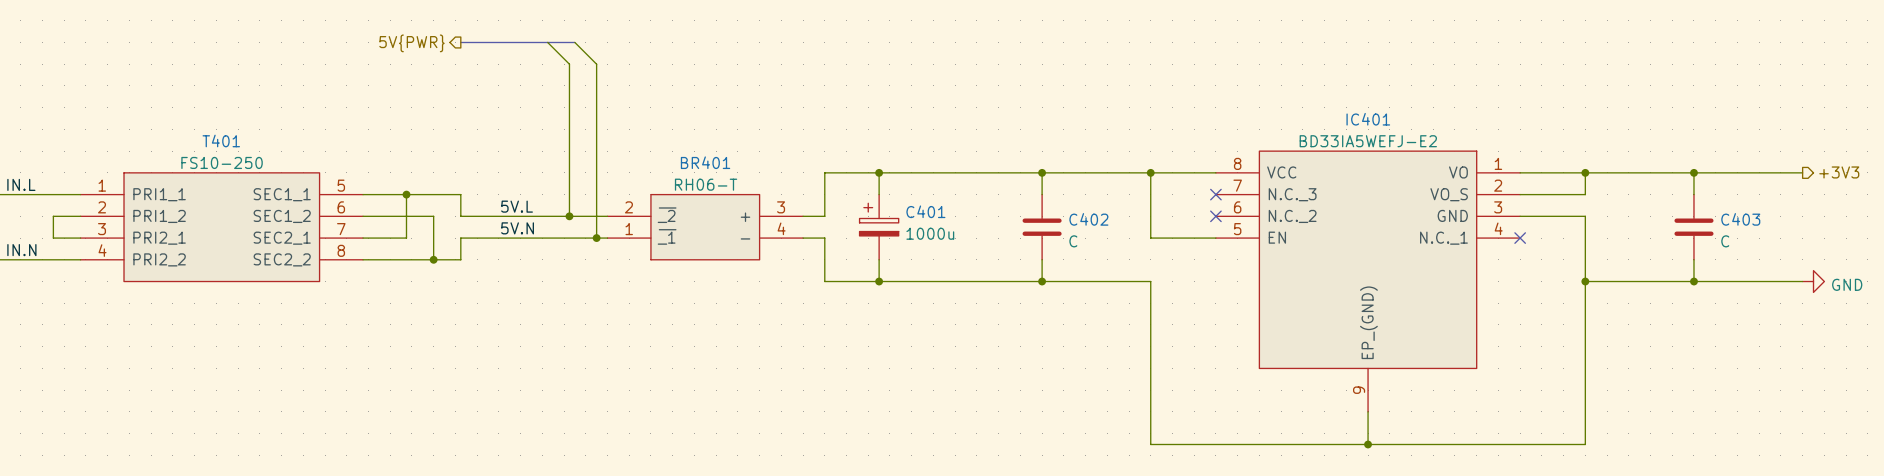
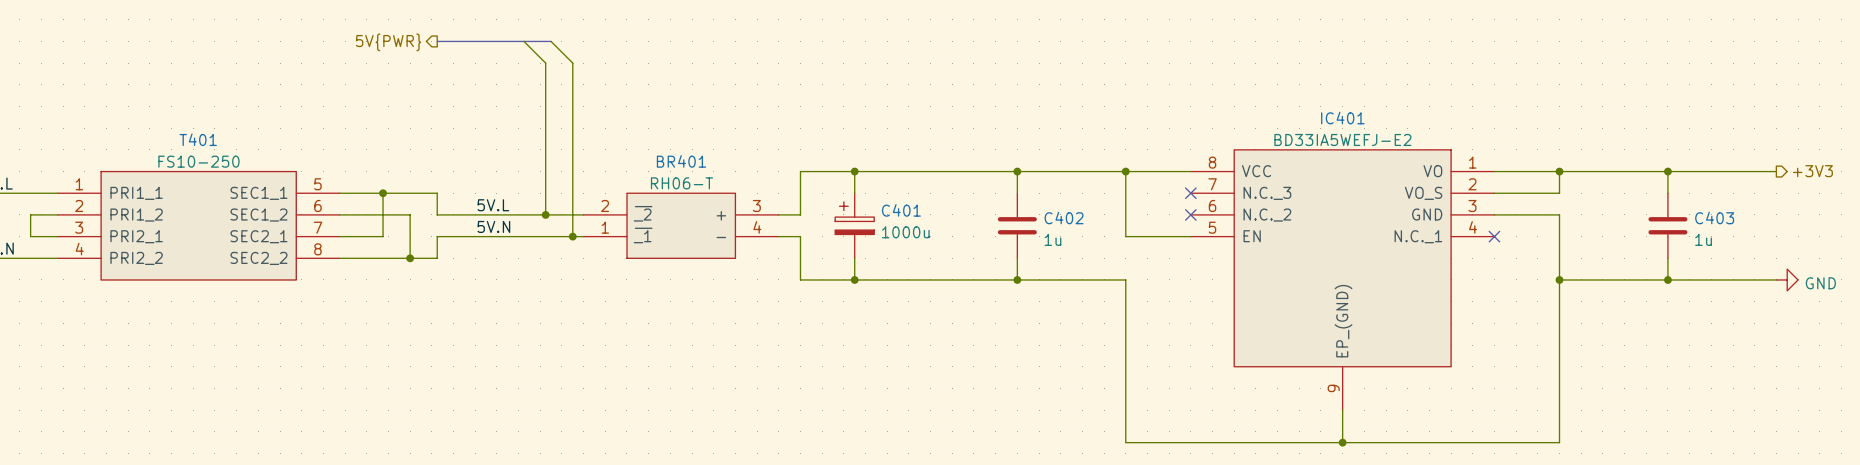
C402 value: C (1073, 241) -> 1u (1052, 239)
C403 value: C (1725, 241) -> 1u (1703, 239)

